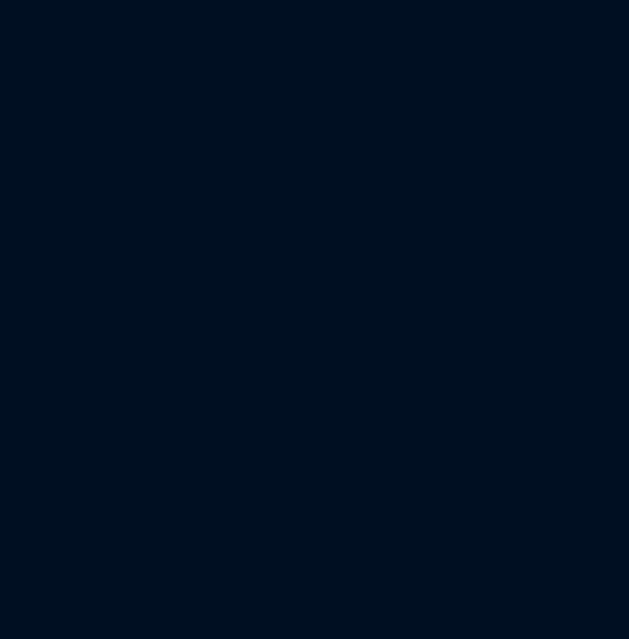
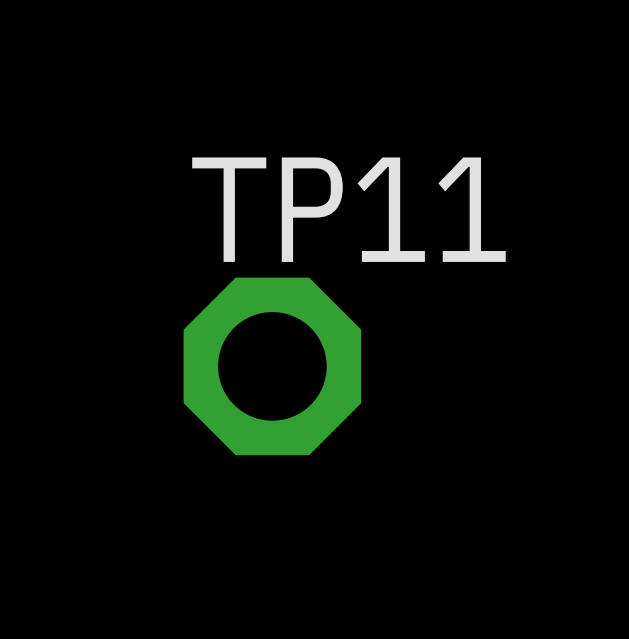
TP11: none -> (272, 366)

